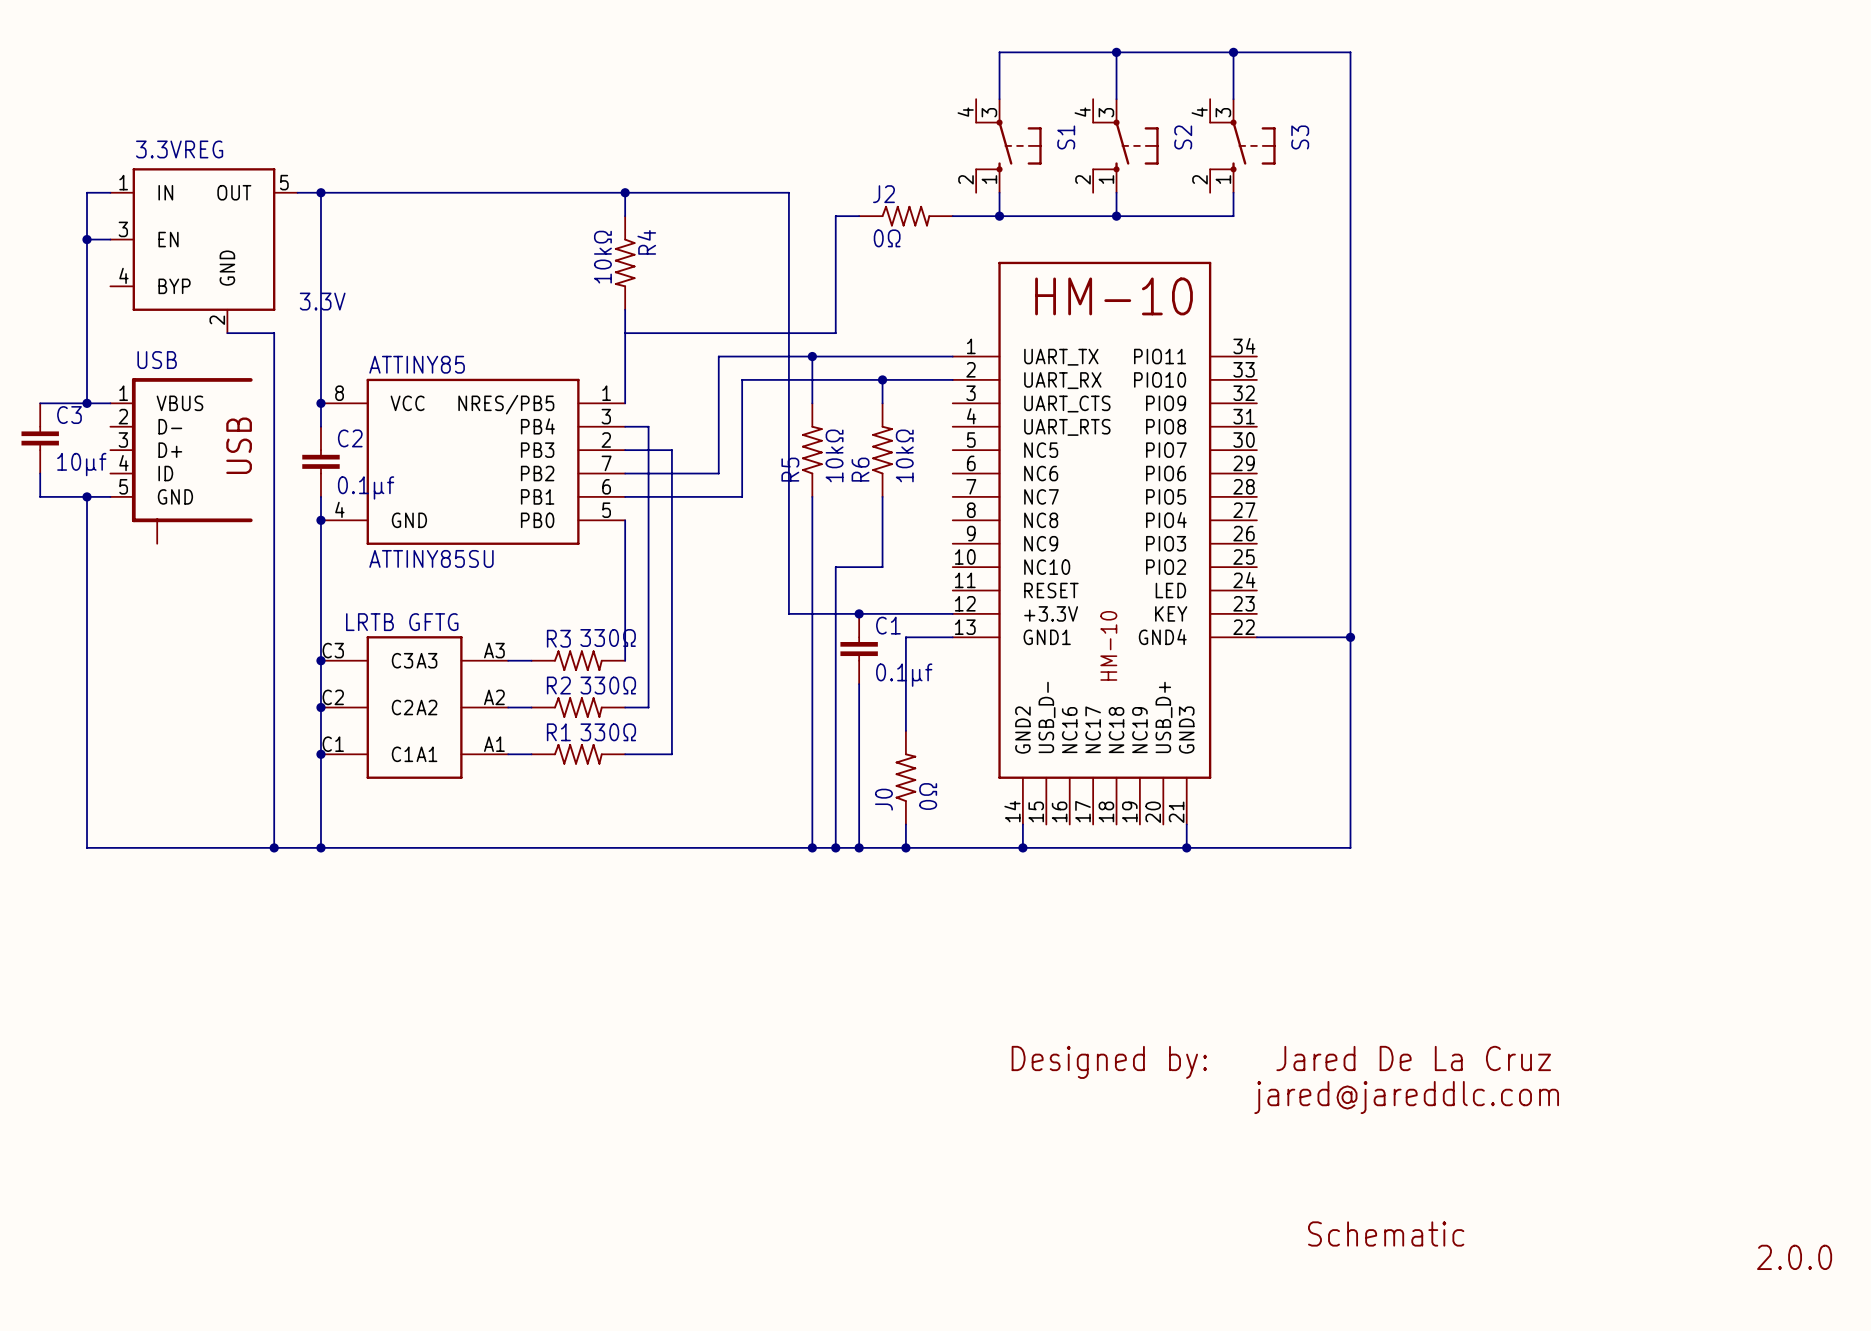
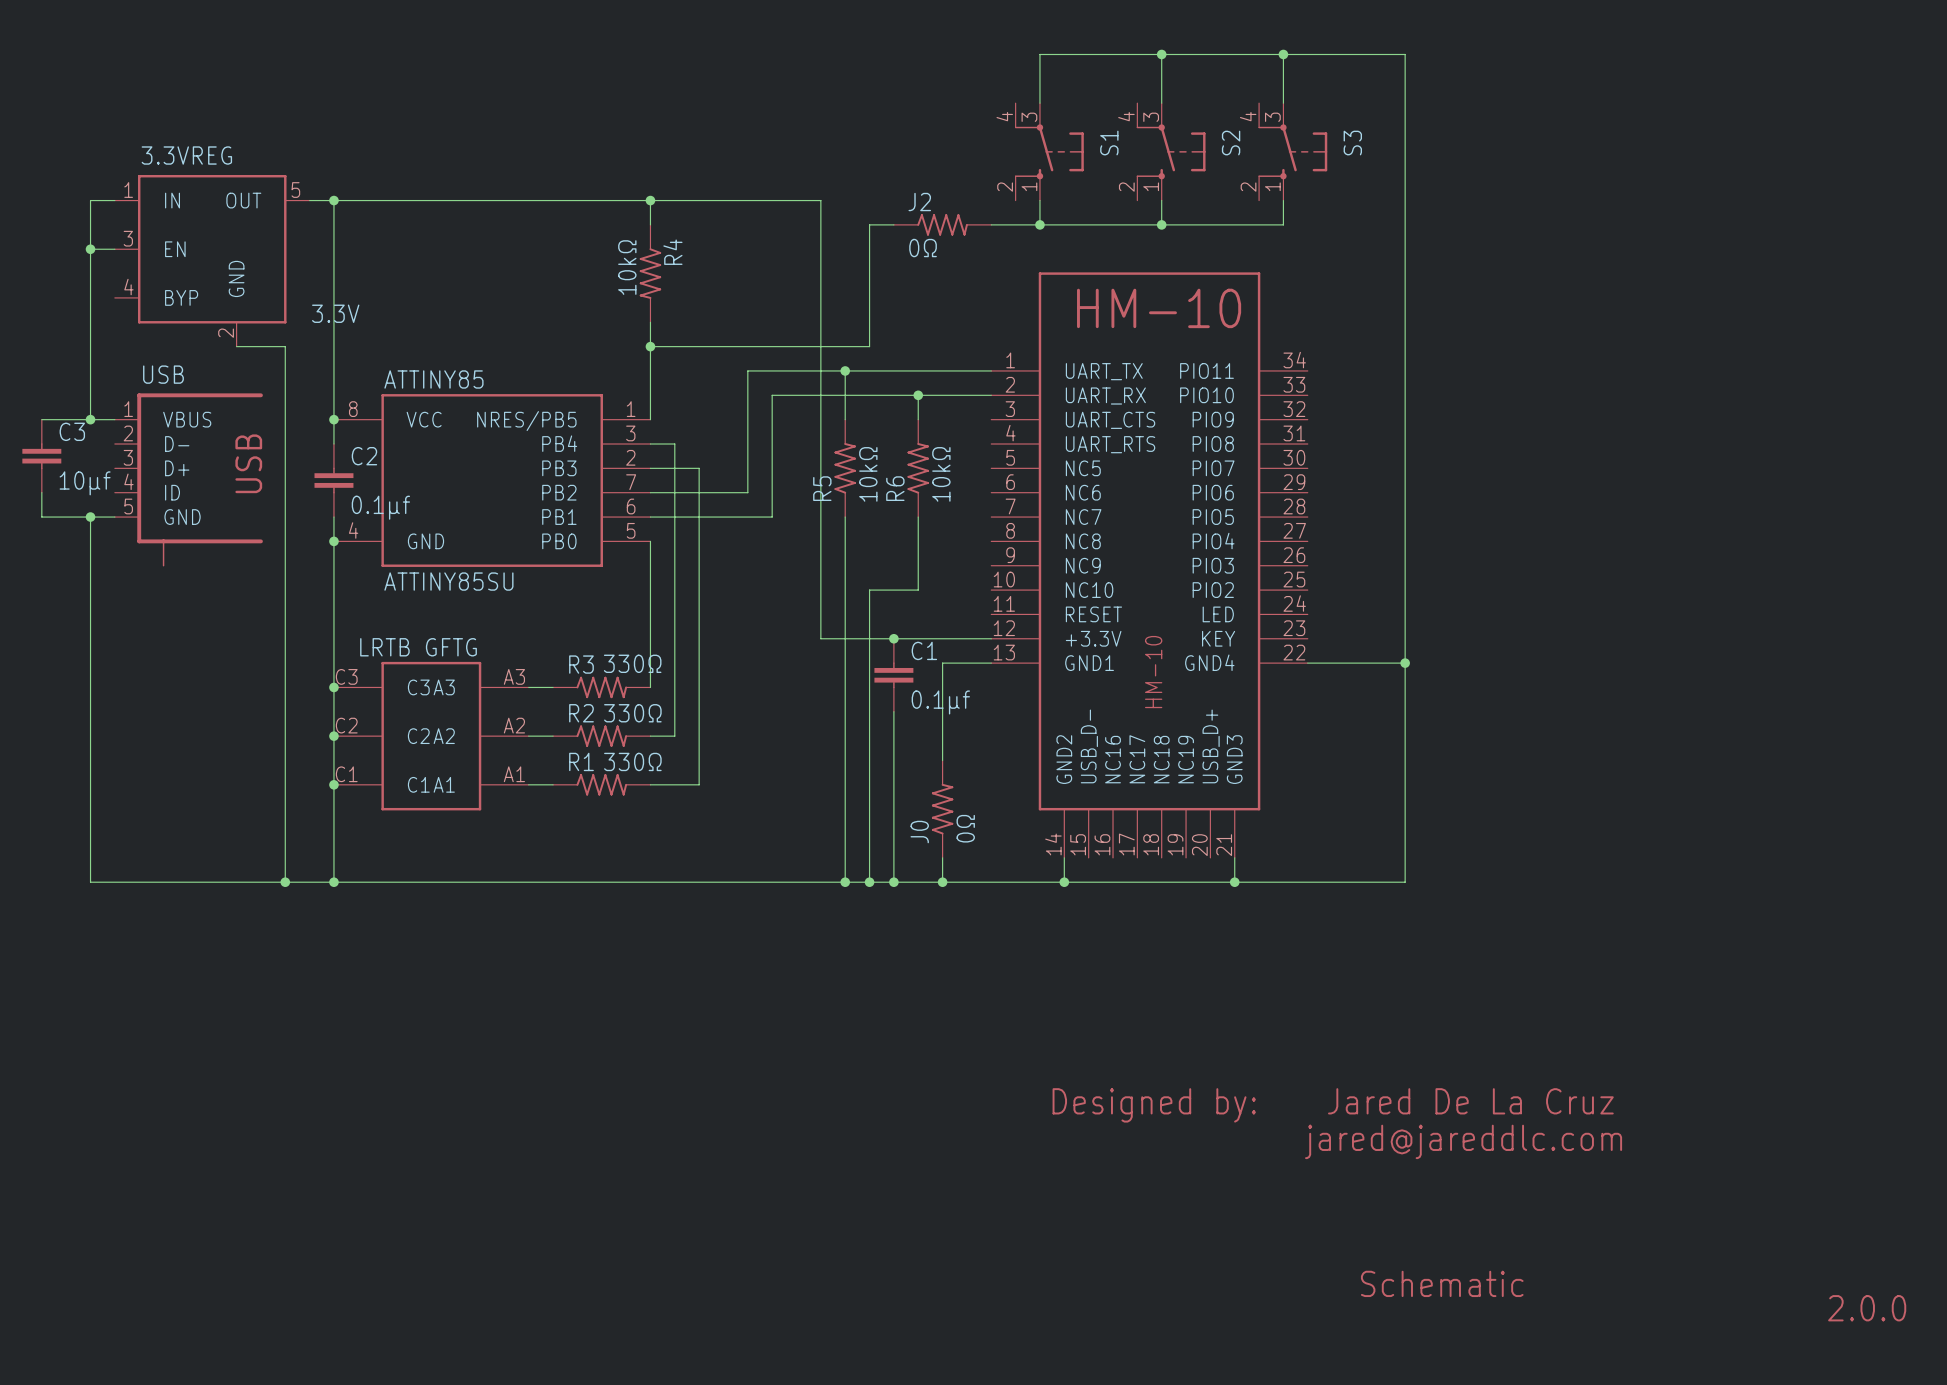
junction: none -> (650, 346)

